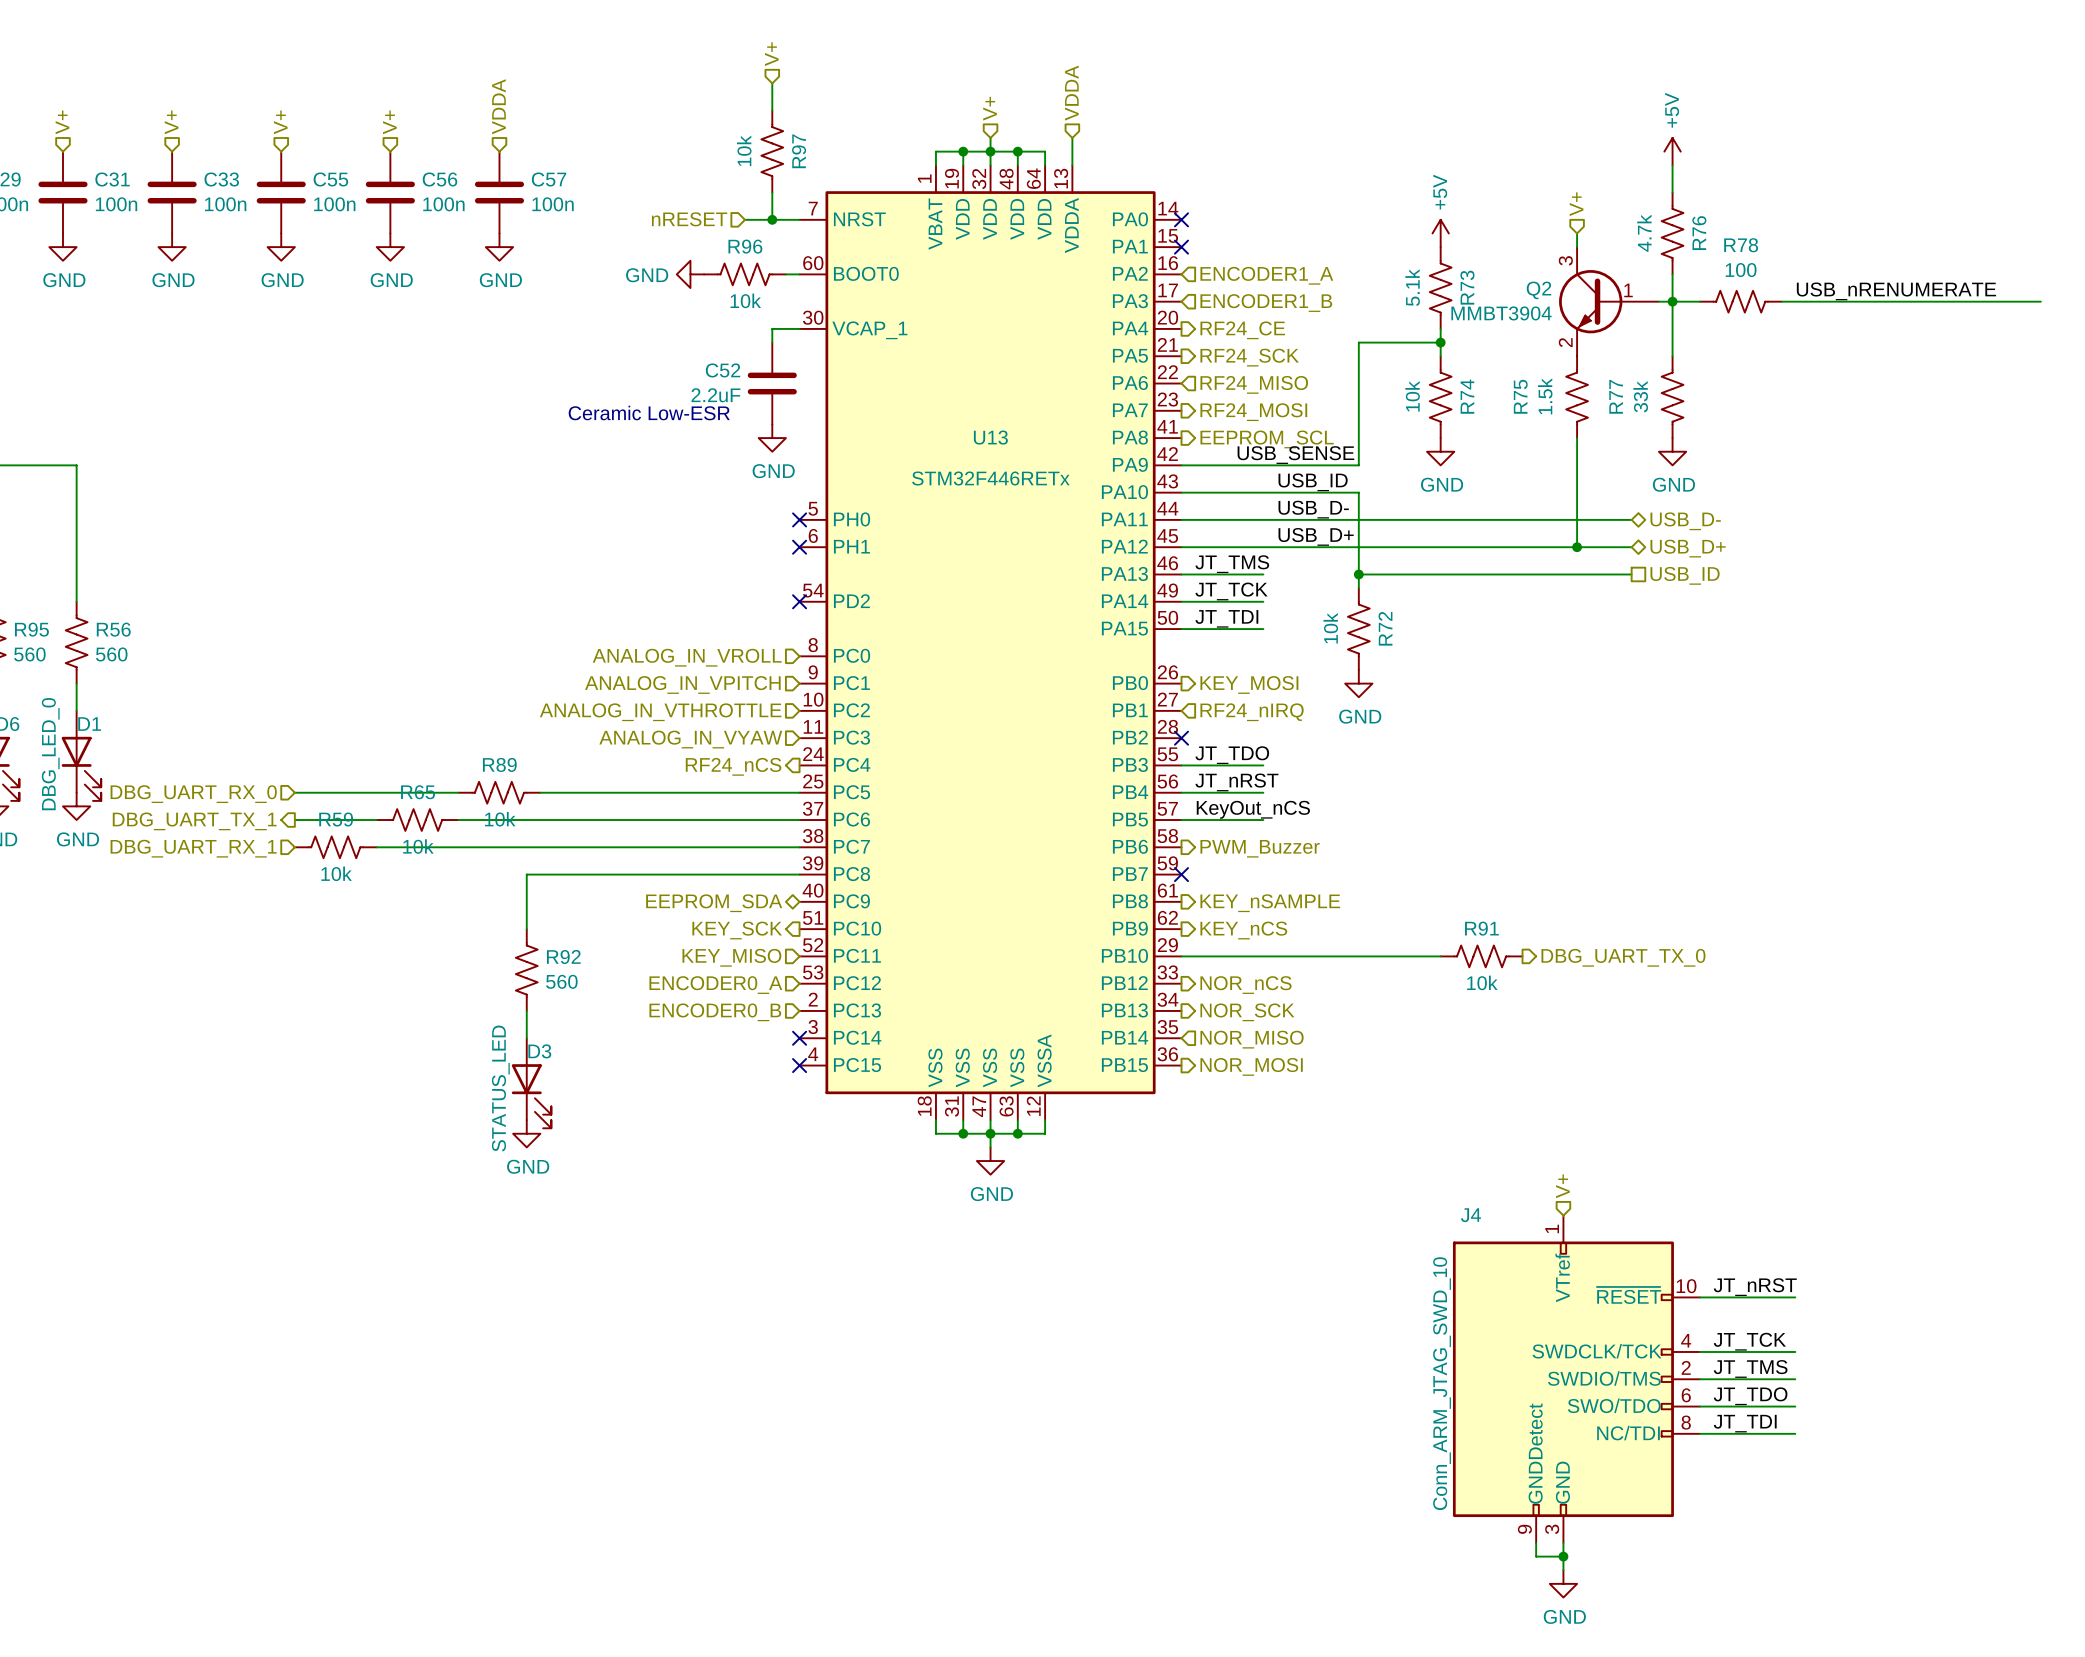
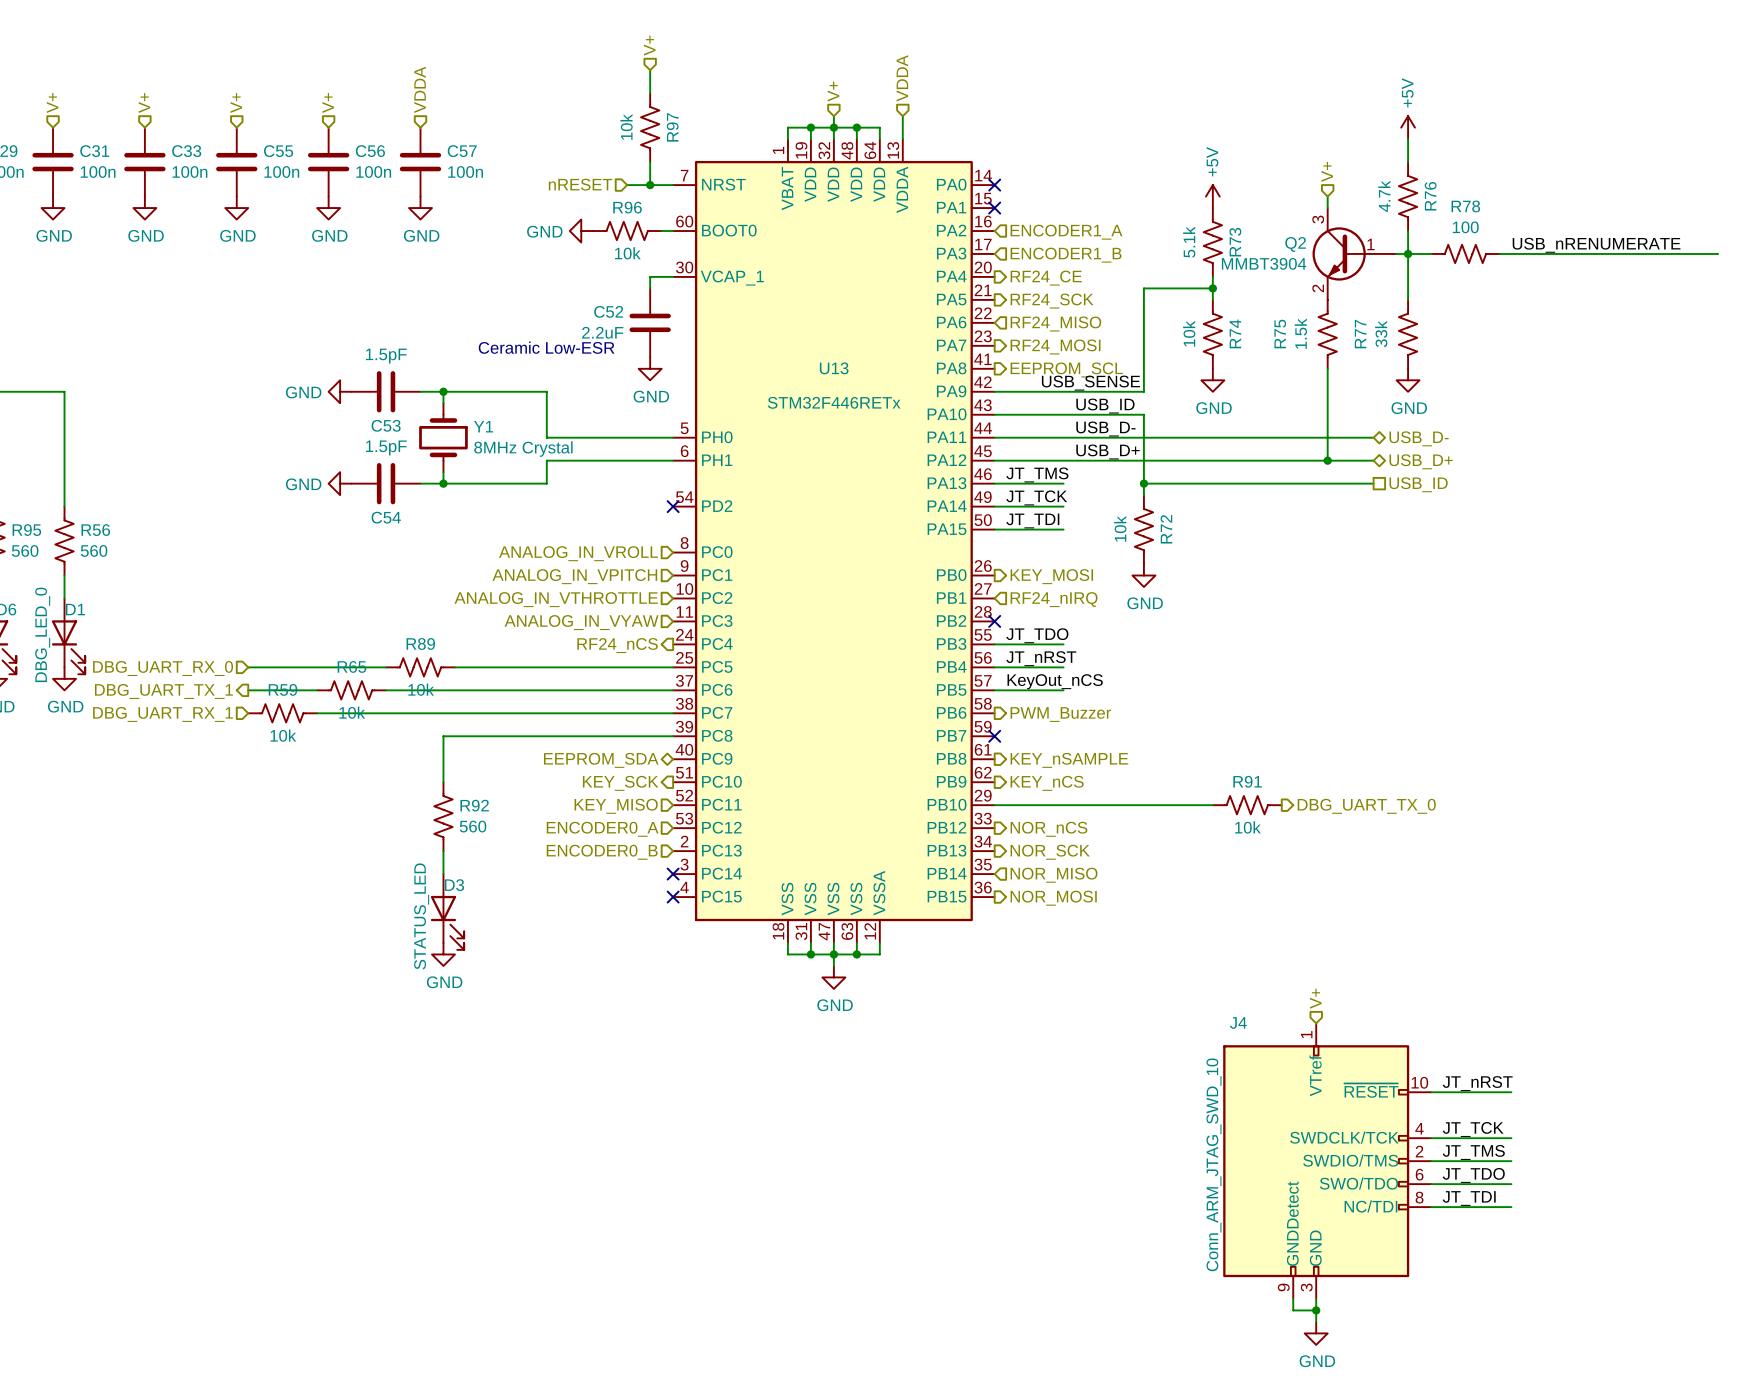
power symbol: none -> GND (340, 391)
C53: none -> 1.5pF (386, 391)
wire: none -> (420, 391) (546, 391) (546, 437) (673, 437)
wire: none -> (443, 391) (443, 403)
junction: none -> (443, 391)
Y1: none -> 8MHz Crystal (443, 437)
no-connect mark: (799, 519) -> none
wire: none -> (673, 460) (546, 460) (546, 483) (420, 483)
no-connect mark: (799, 547) -> none
wire: none -> (443, 472) (443, 483)
power symbol: none -> GND (340, 483)
C54: none -> 1.5pF (386, 483)
junction: none -> (443, 483)

